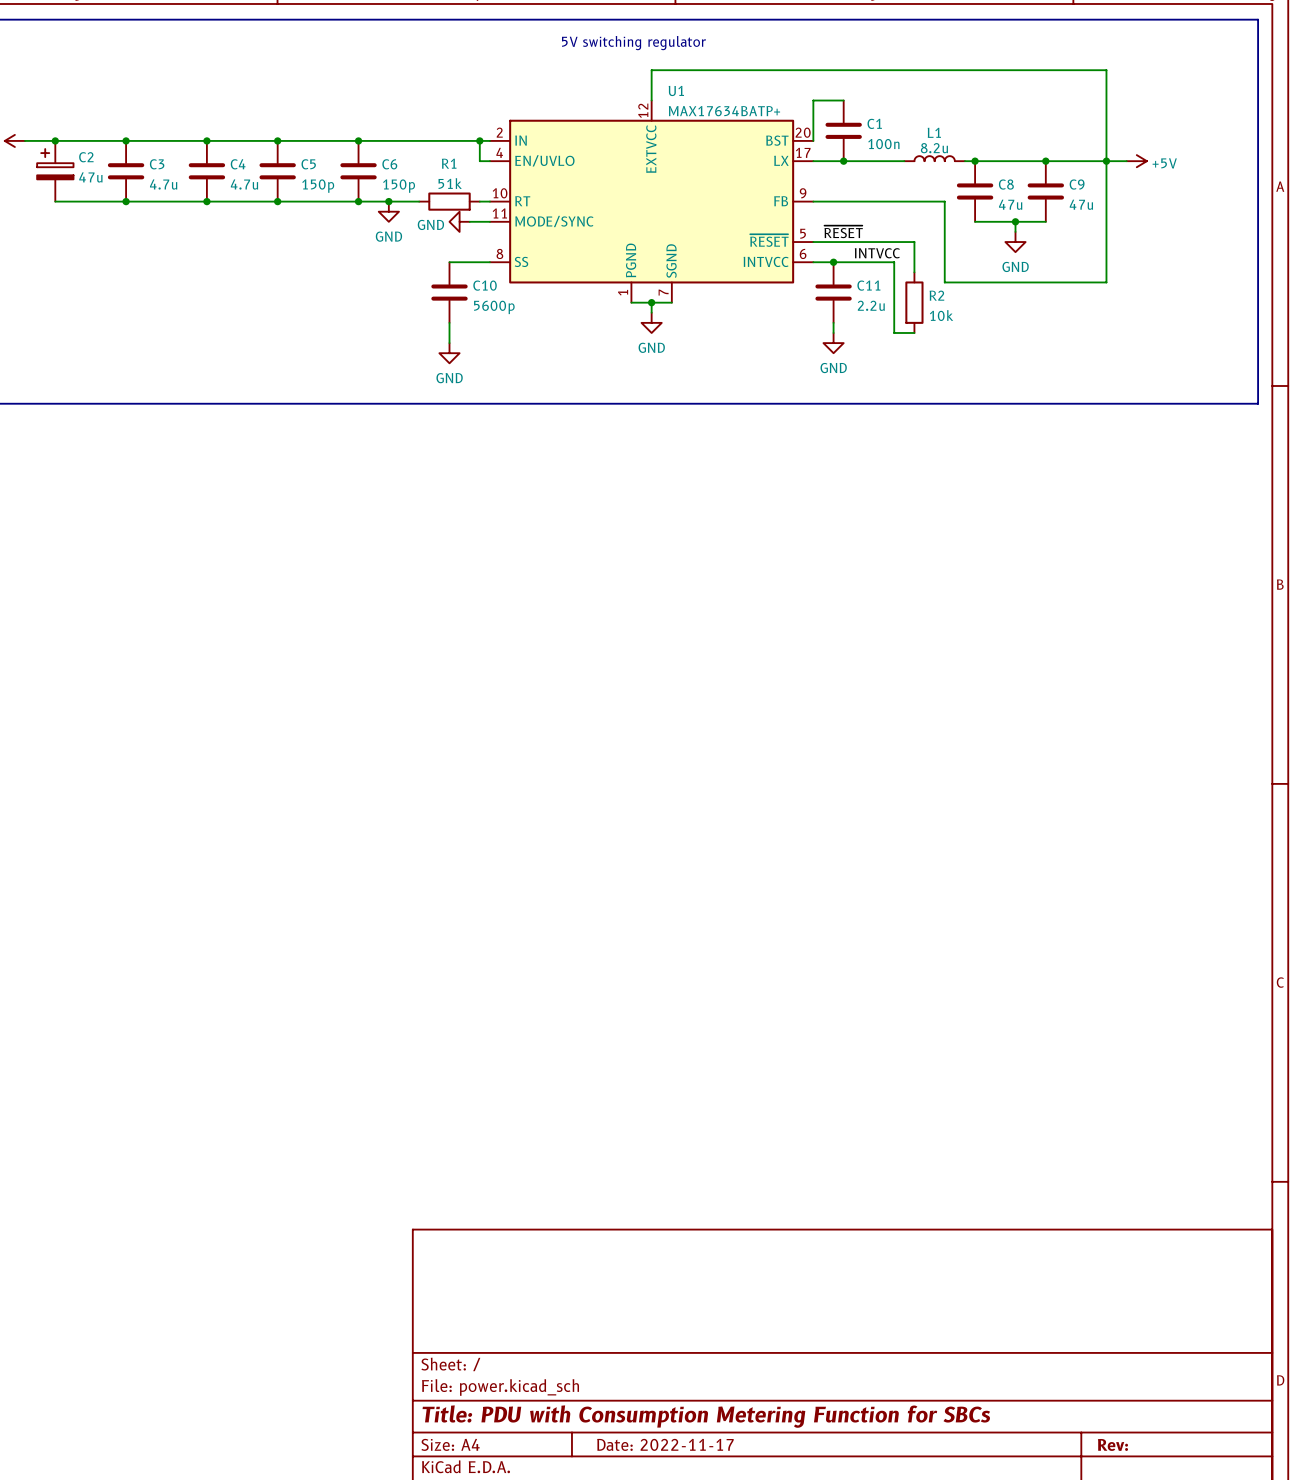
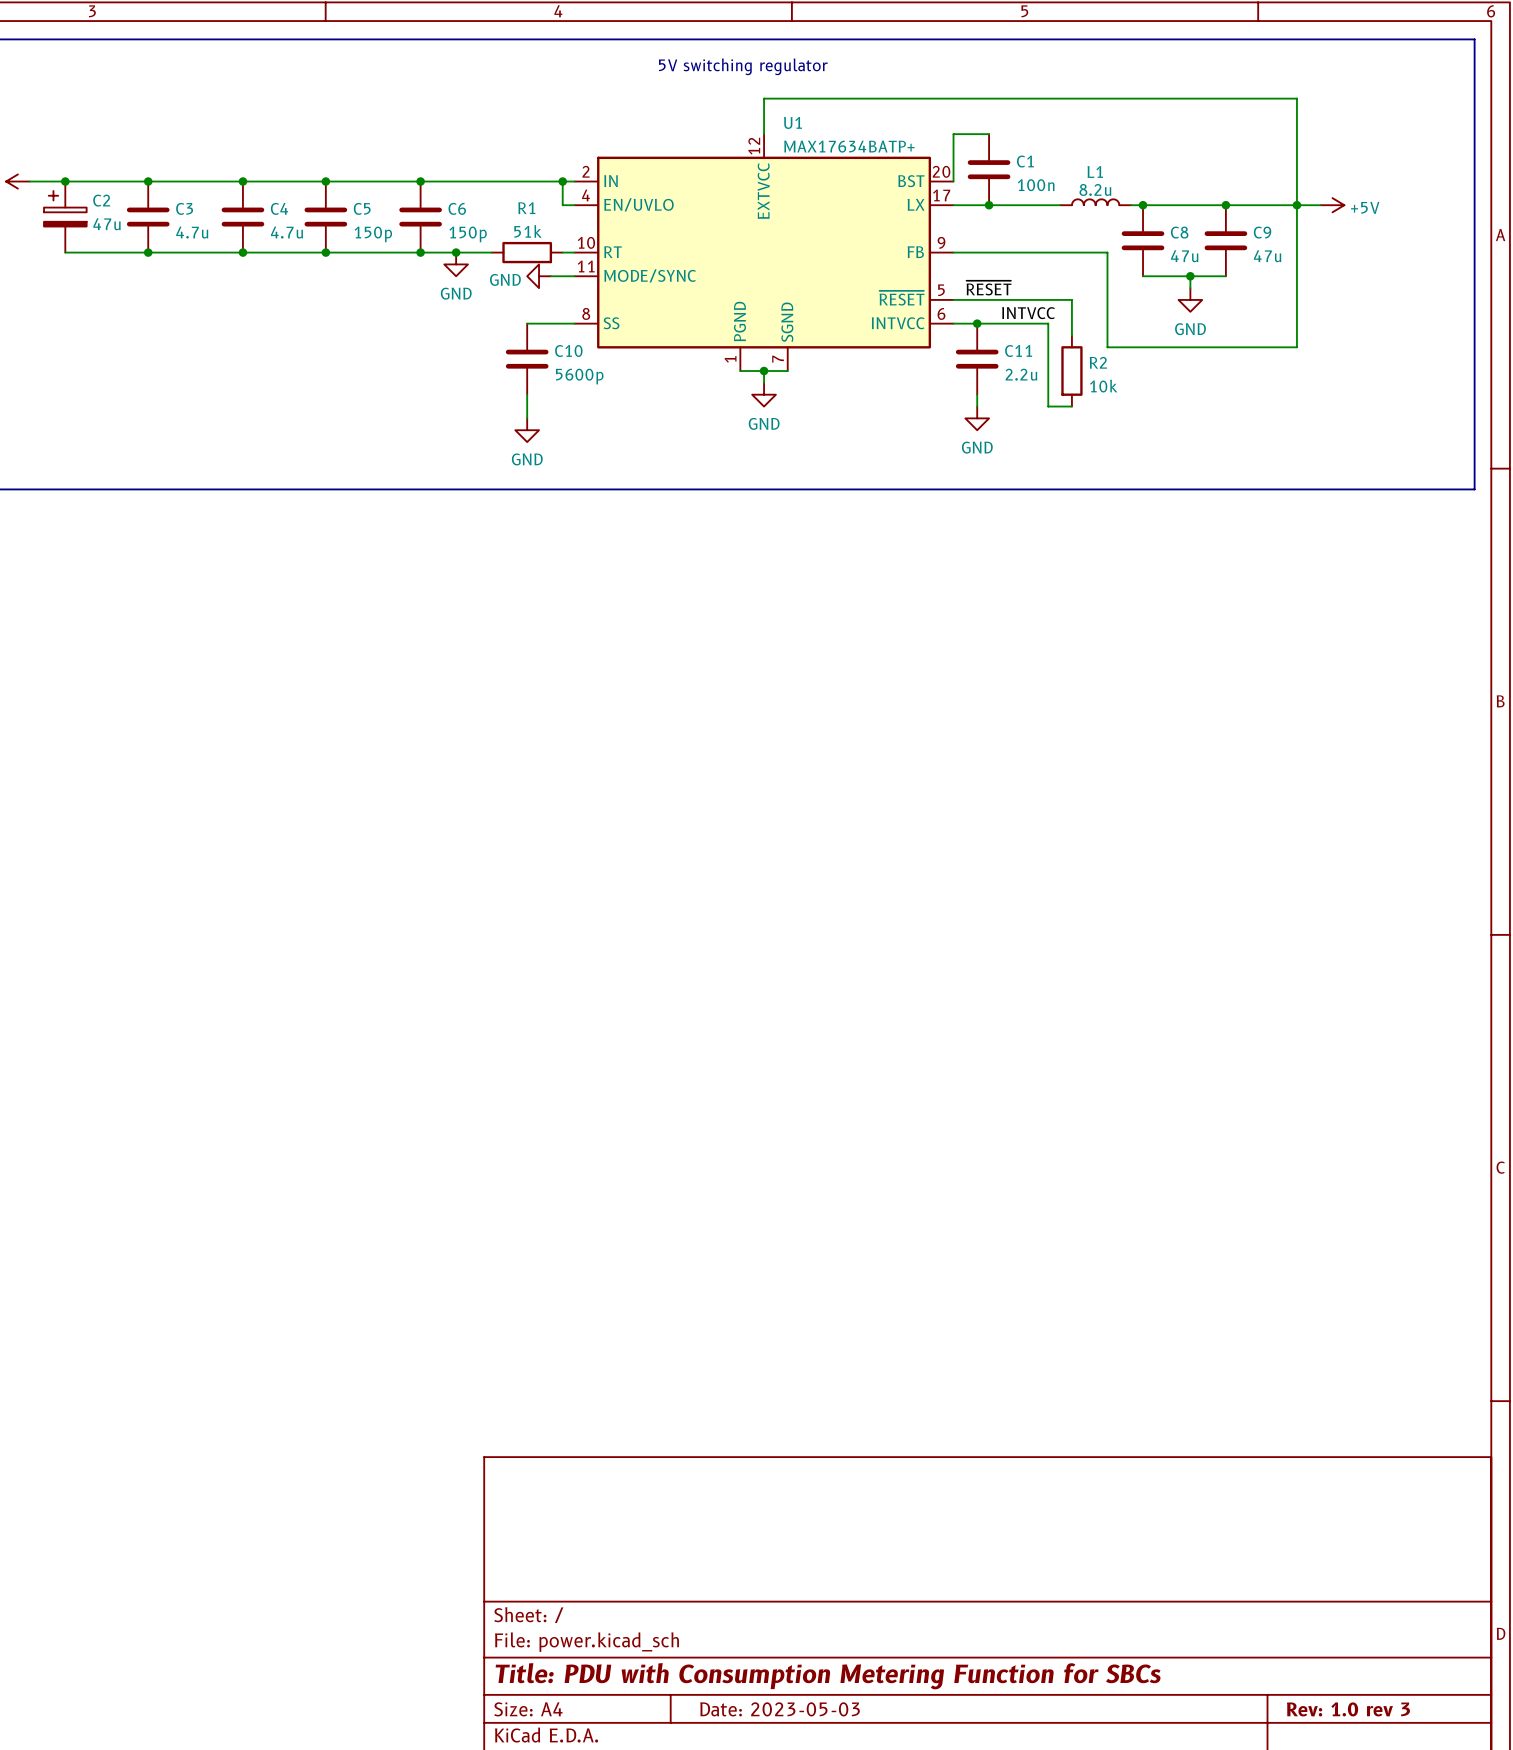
title block: Date: 2022-11-17 (665, 1444) -> Date: 2023-05-03 (780, 1709)
title block: Rev: (1112, 1444) -> Rev: 1.0 rev 3 (1348, 1709)

